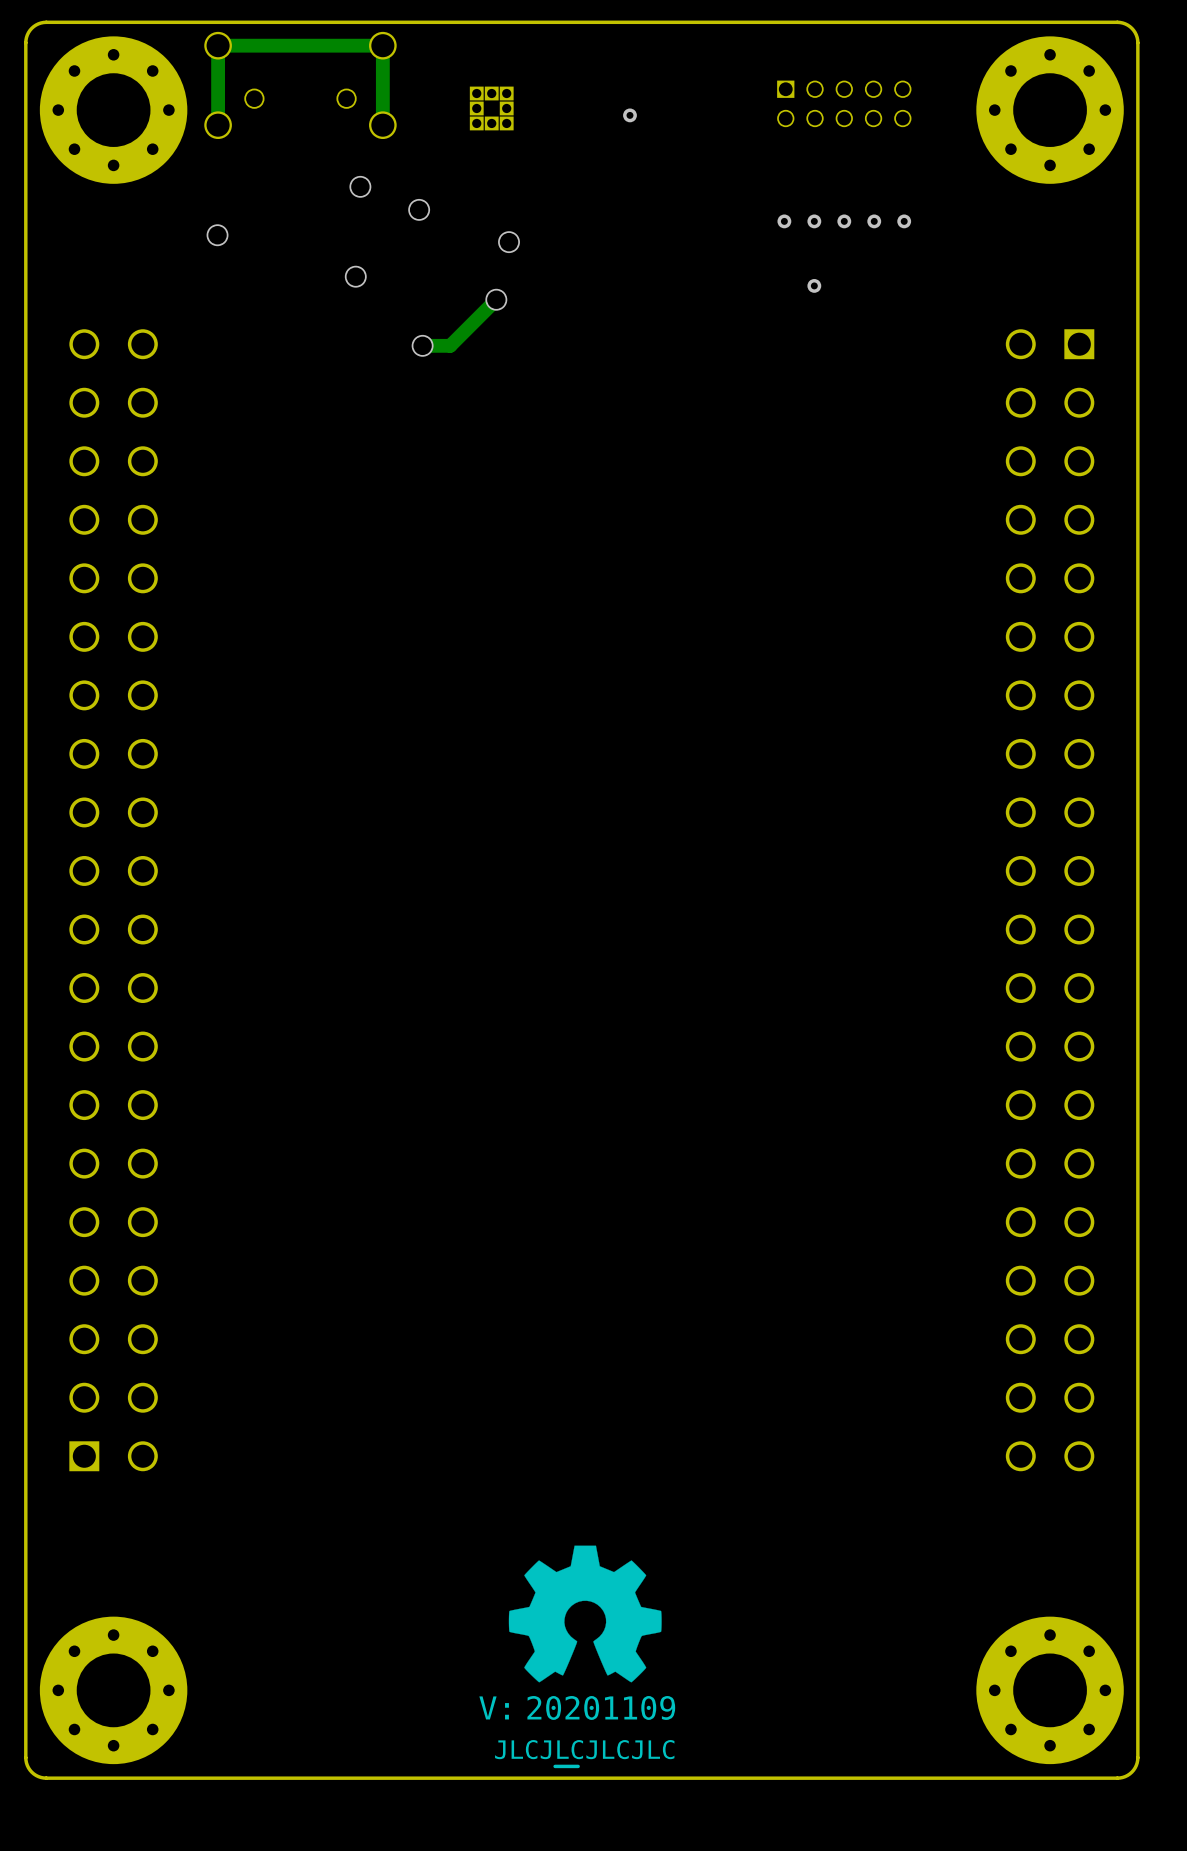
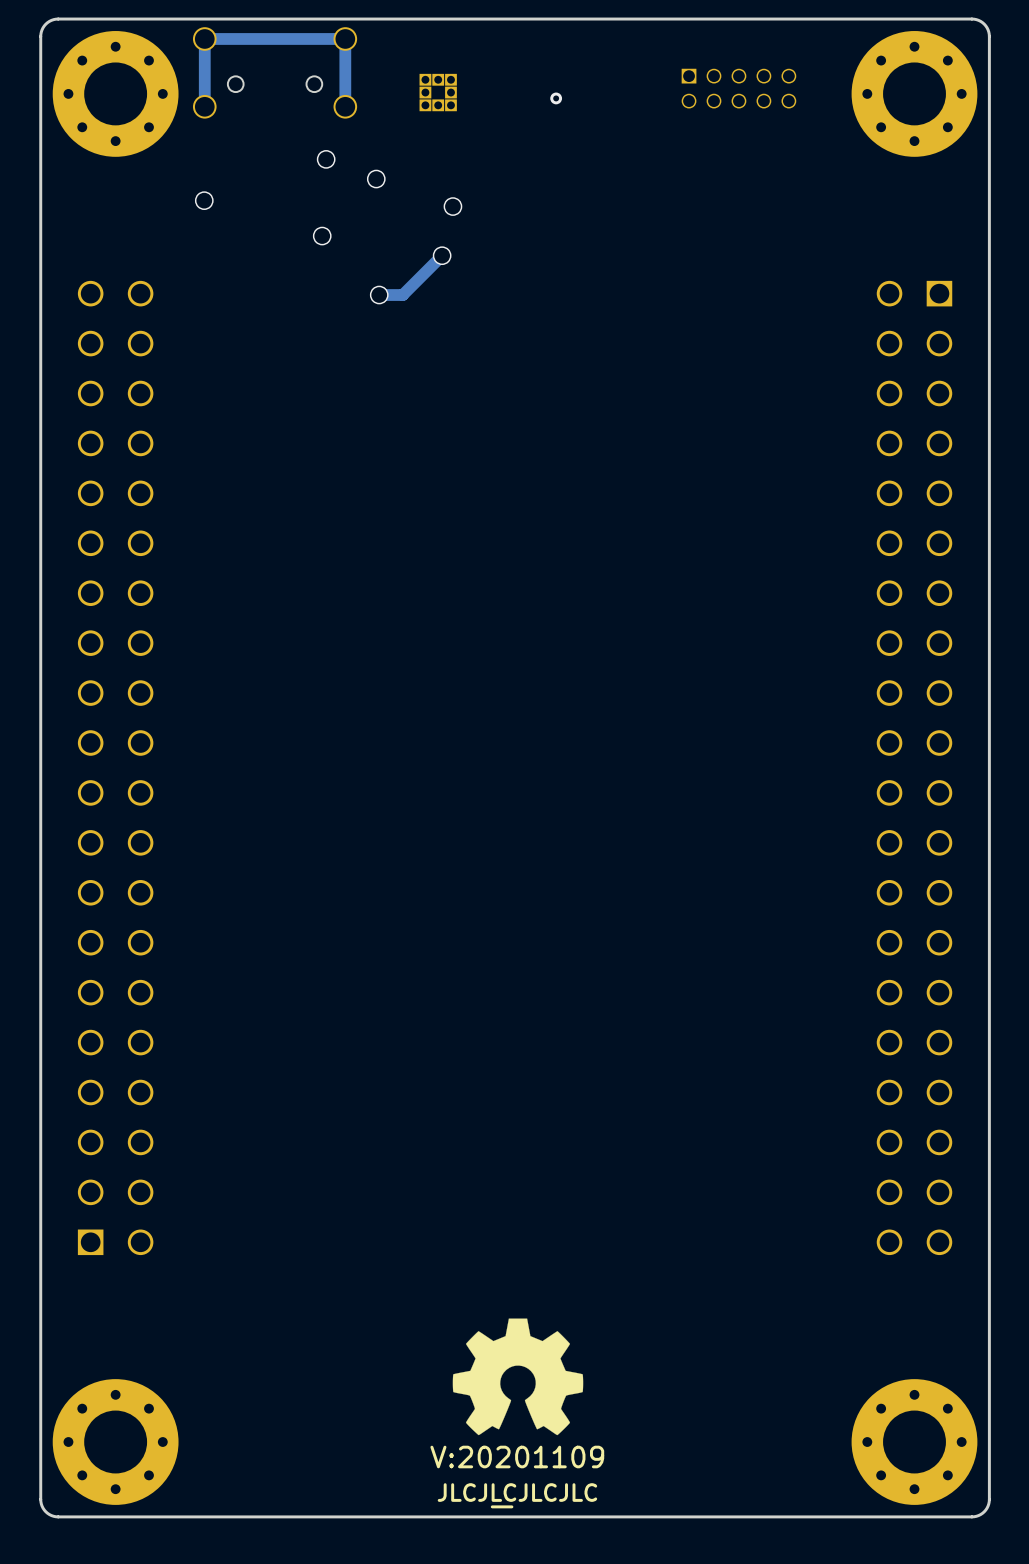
via: (784, 221) -> none
via: (814, 221) -> none
via: (844, 221) -> none
via: (874, 221) -> none
via: (904, 221) -> none
via: (814, 285) -> none

